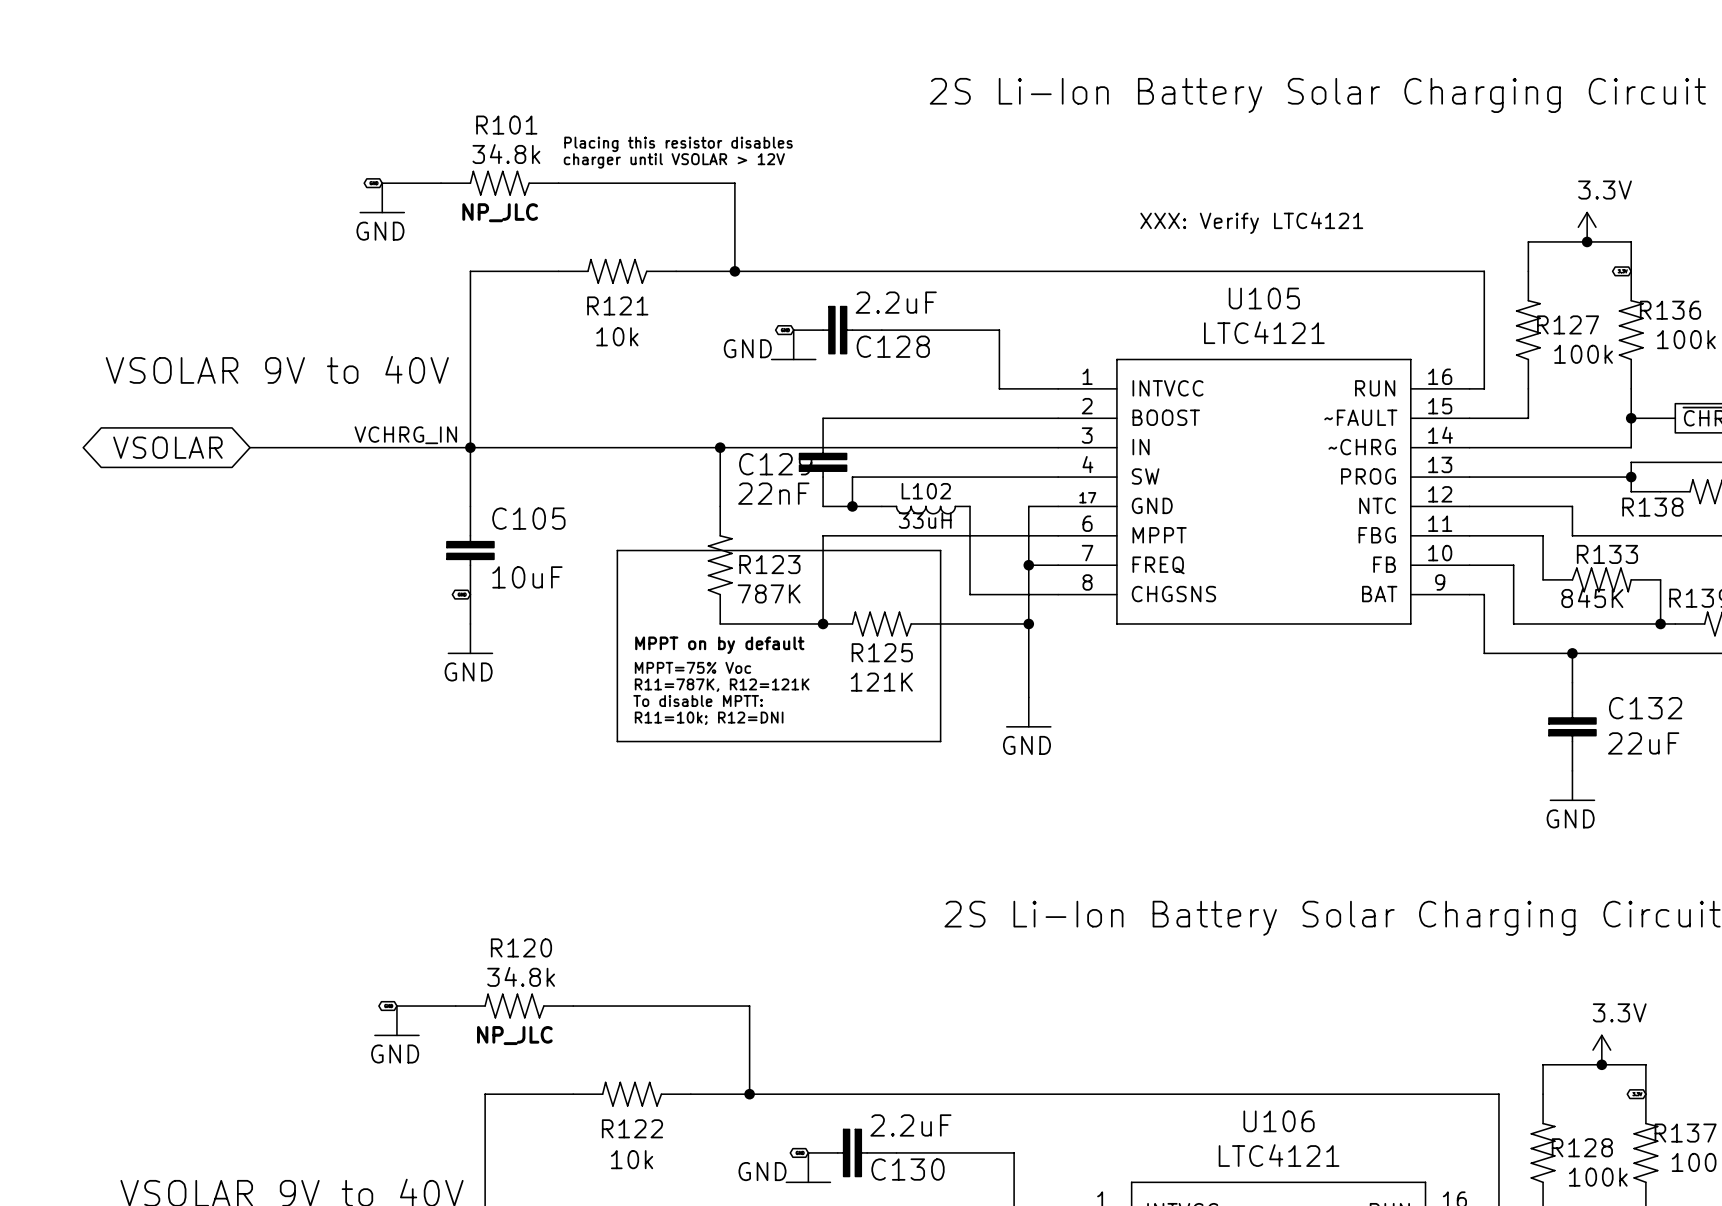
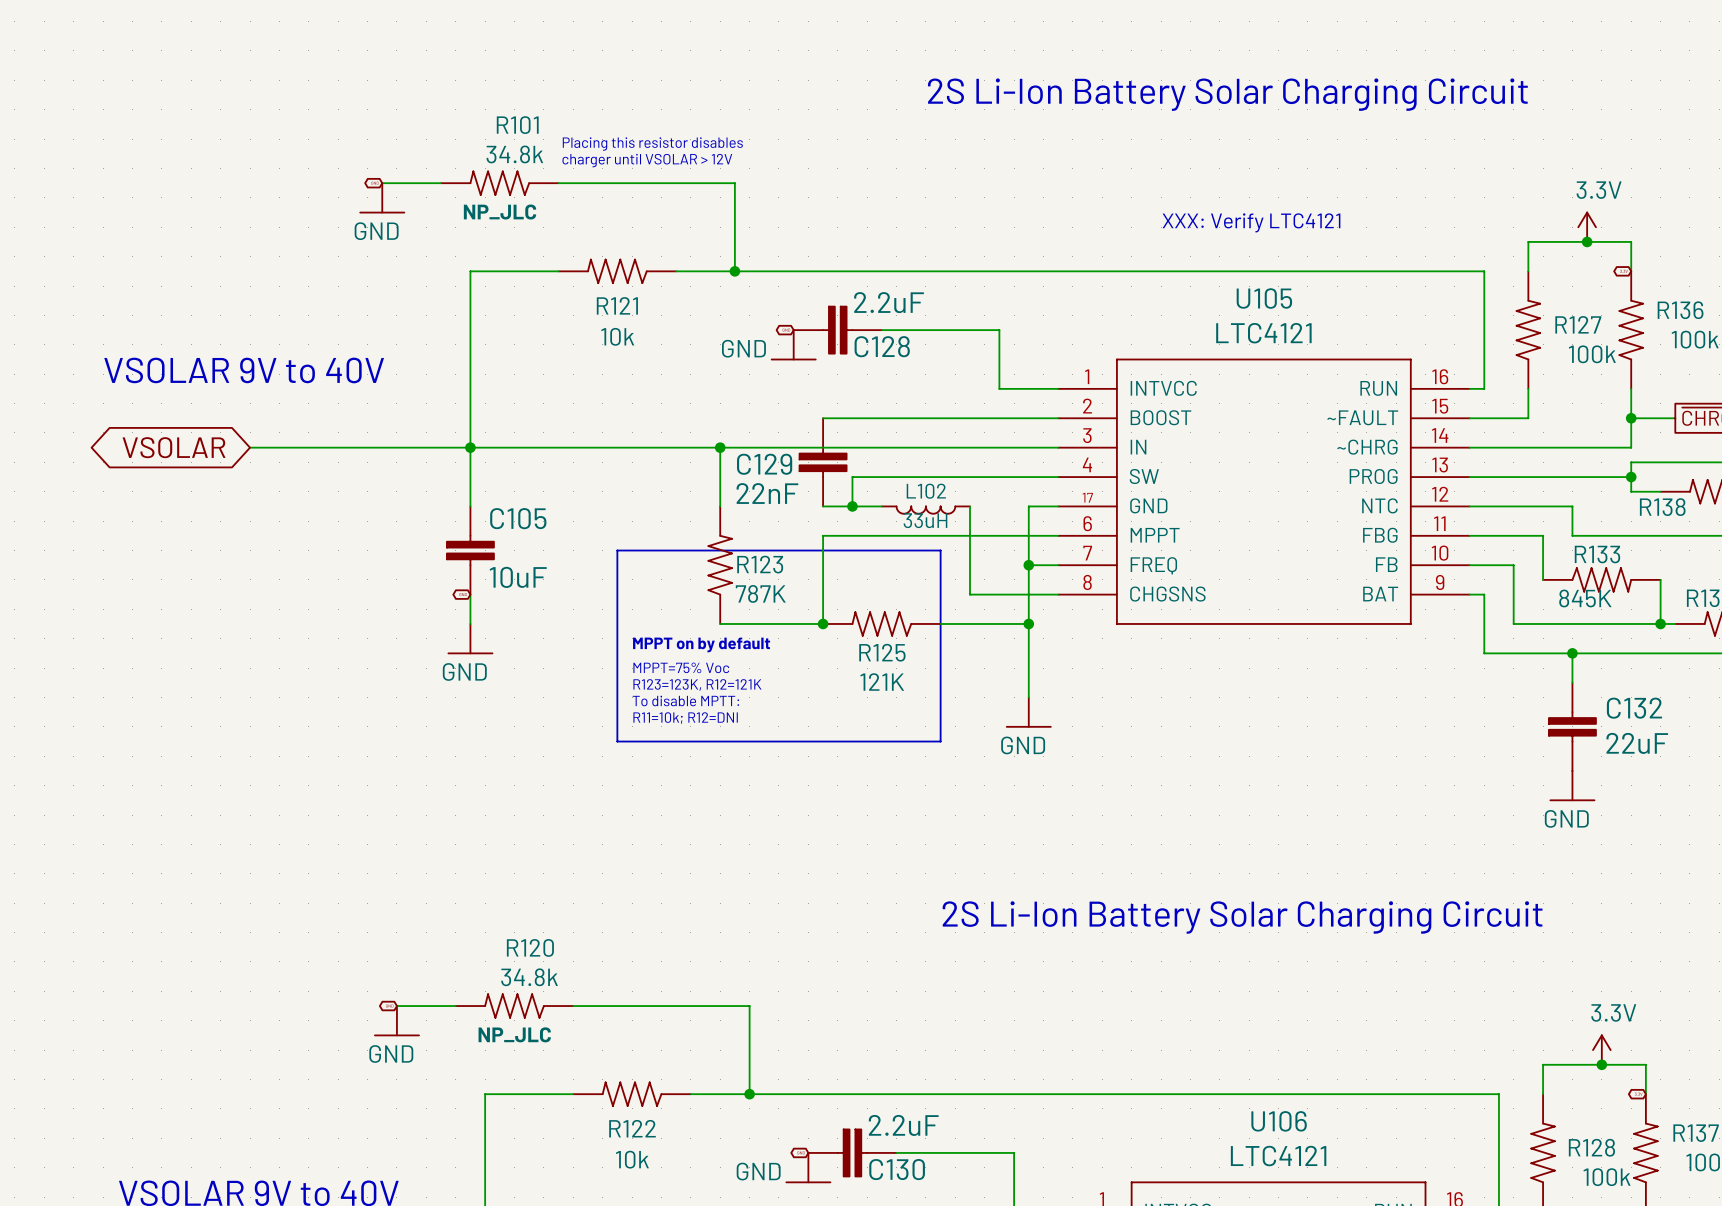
label: VCHRG_IN (405, 435) -> none
text: R11=787K, R12=121K (722, 685) -> R123=123K, R12=121K (697, 684)

